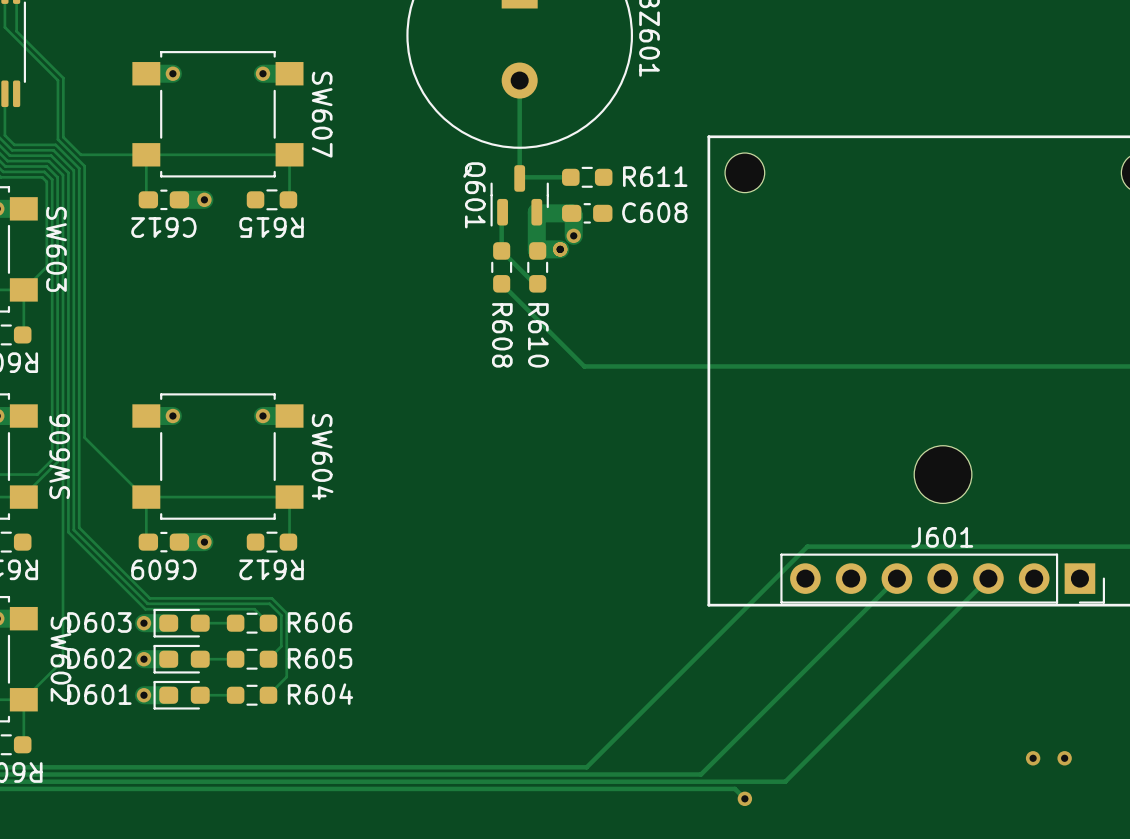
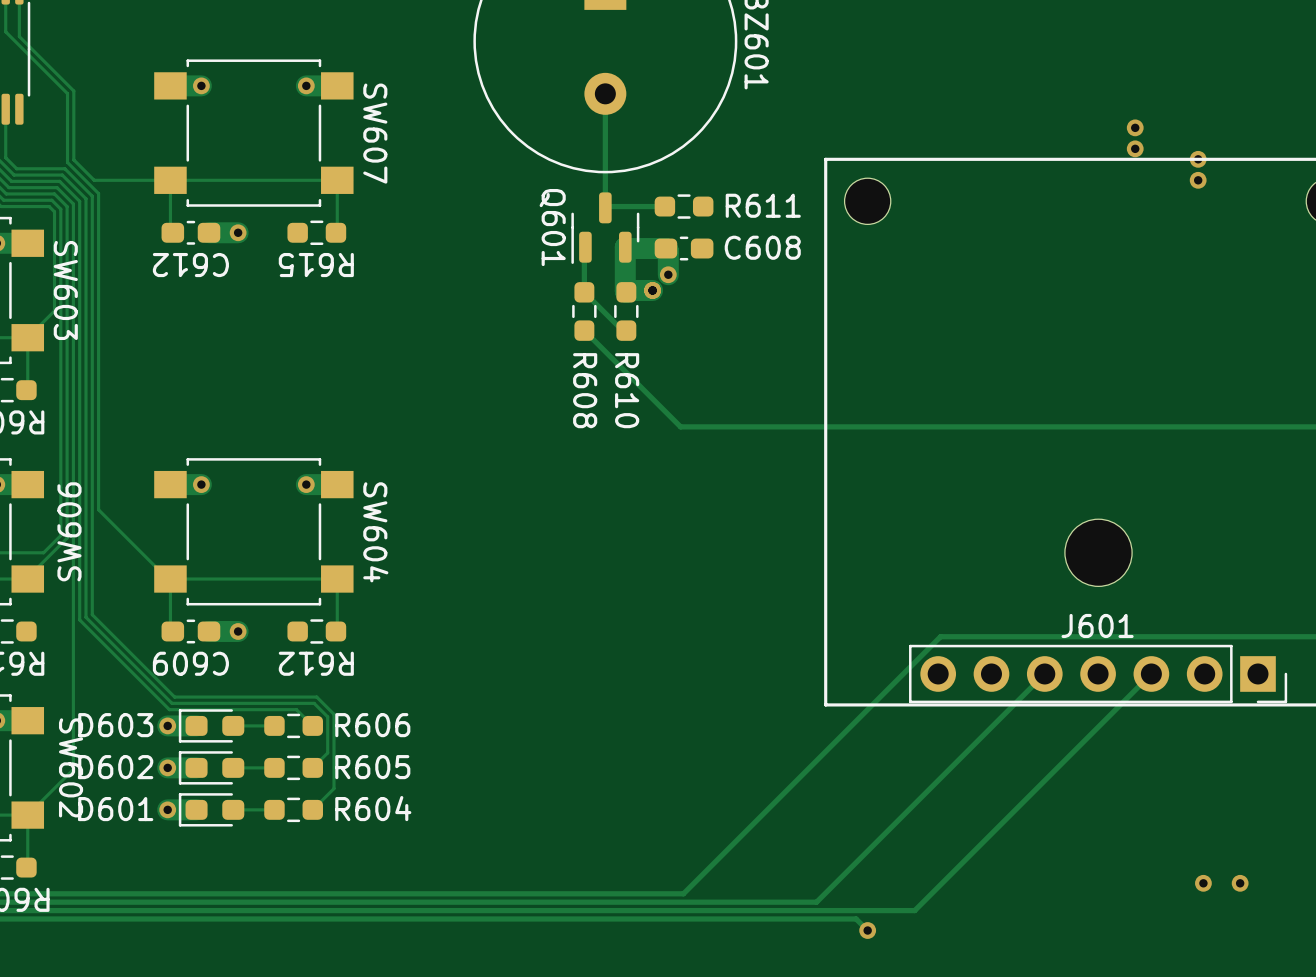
via: none -> (1135, 127)
via: none -> (1135, 148)
via: none -> (1198, 159)
via: none -> (1198, 180)

